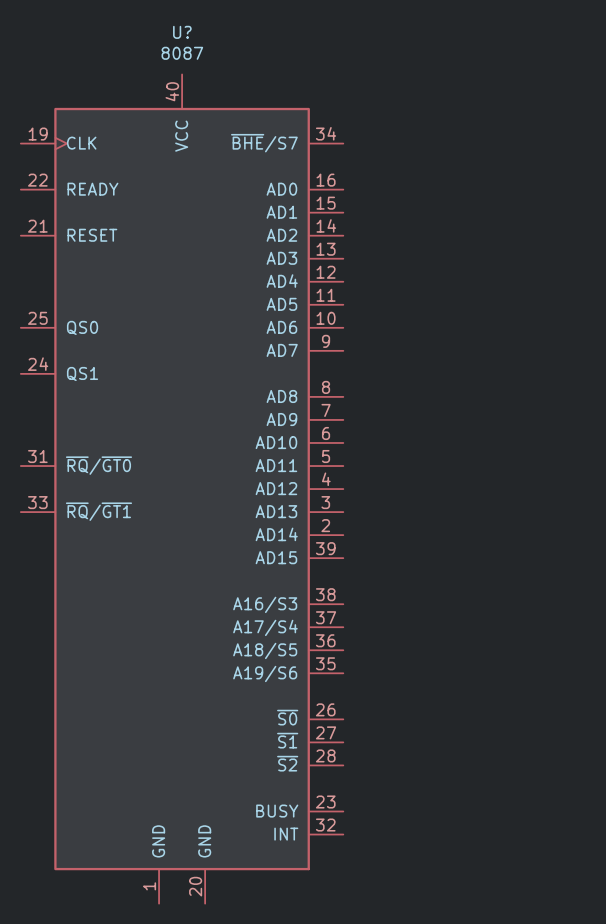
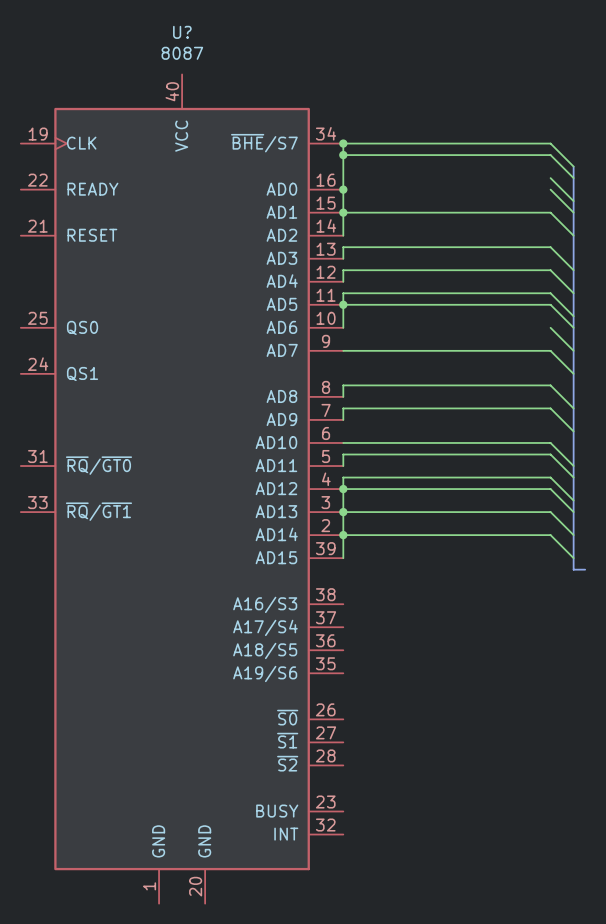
junction: none -> (343, 143)
wire: none -> (343, 155) (550, 155) (573, 178)
junction: none -> (343, 155)
bus: none -> (573, 166) (573, 569) (585, 569)
wire: none -> (573, 166) (550, 143) (343, 143) (343, 235)
wire: none -> (550, 178) (573, 201)
junction: none -> (343, 189)
wire: none -> (550, 189) (573, 212)
wire: none -> (343, 212) (550, 212) (573, 235)
junction: none -> (343, 212)
wire: none -> (343, 258) (343, 247) (550, 247) (573, 270)
wire: none -> (343, 281) (343, 270) (550, 270) (573, 293)
wire: none -> (343, 304) (550, 304) (573, 327)
junction: none -> (343, 304)
wire: none -> (573, 316) (550, 293) (343, 293) (343, 327)
wire: none -> (550, 327) (573, 350)
wire: none -> (343, 350) (550, 350) (573, 373)
wire: none -> (343, 396) (343, 385) (550, 385) (573, 408)
wire: none -> (343, 419) (343, 408) (550, 408) (573, 431)
wire: none -> (343, 442) (550, 442) (573, 466)
wire: none -> (343, 466) (343, 454) (550, 454) (573, 477)
wire: none -> (343, 489) (550, 489) (573, 512)
junction: none -> (343, 489)
wire: none -> (573, 500) (550, 477) (343, 477) (343, 558)
wire: none -> (343, 512) (550, 512) (573, 535)
junction: none -> (343, 512)
wire: none -> (343, 535) (550, 535) (573, 558)
junction: none -> (343, 535)

